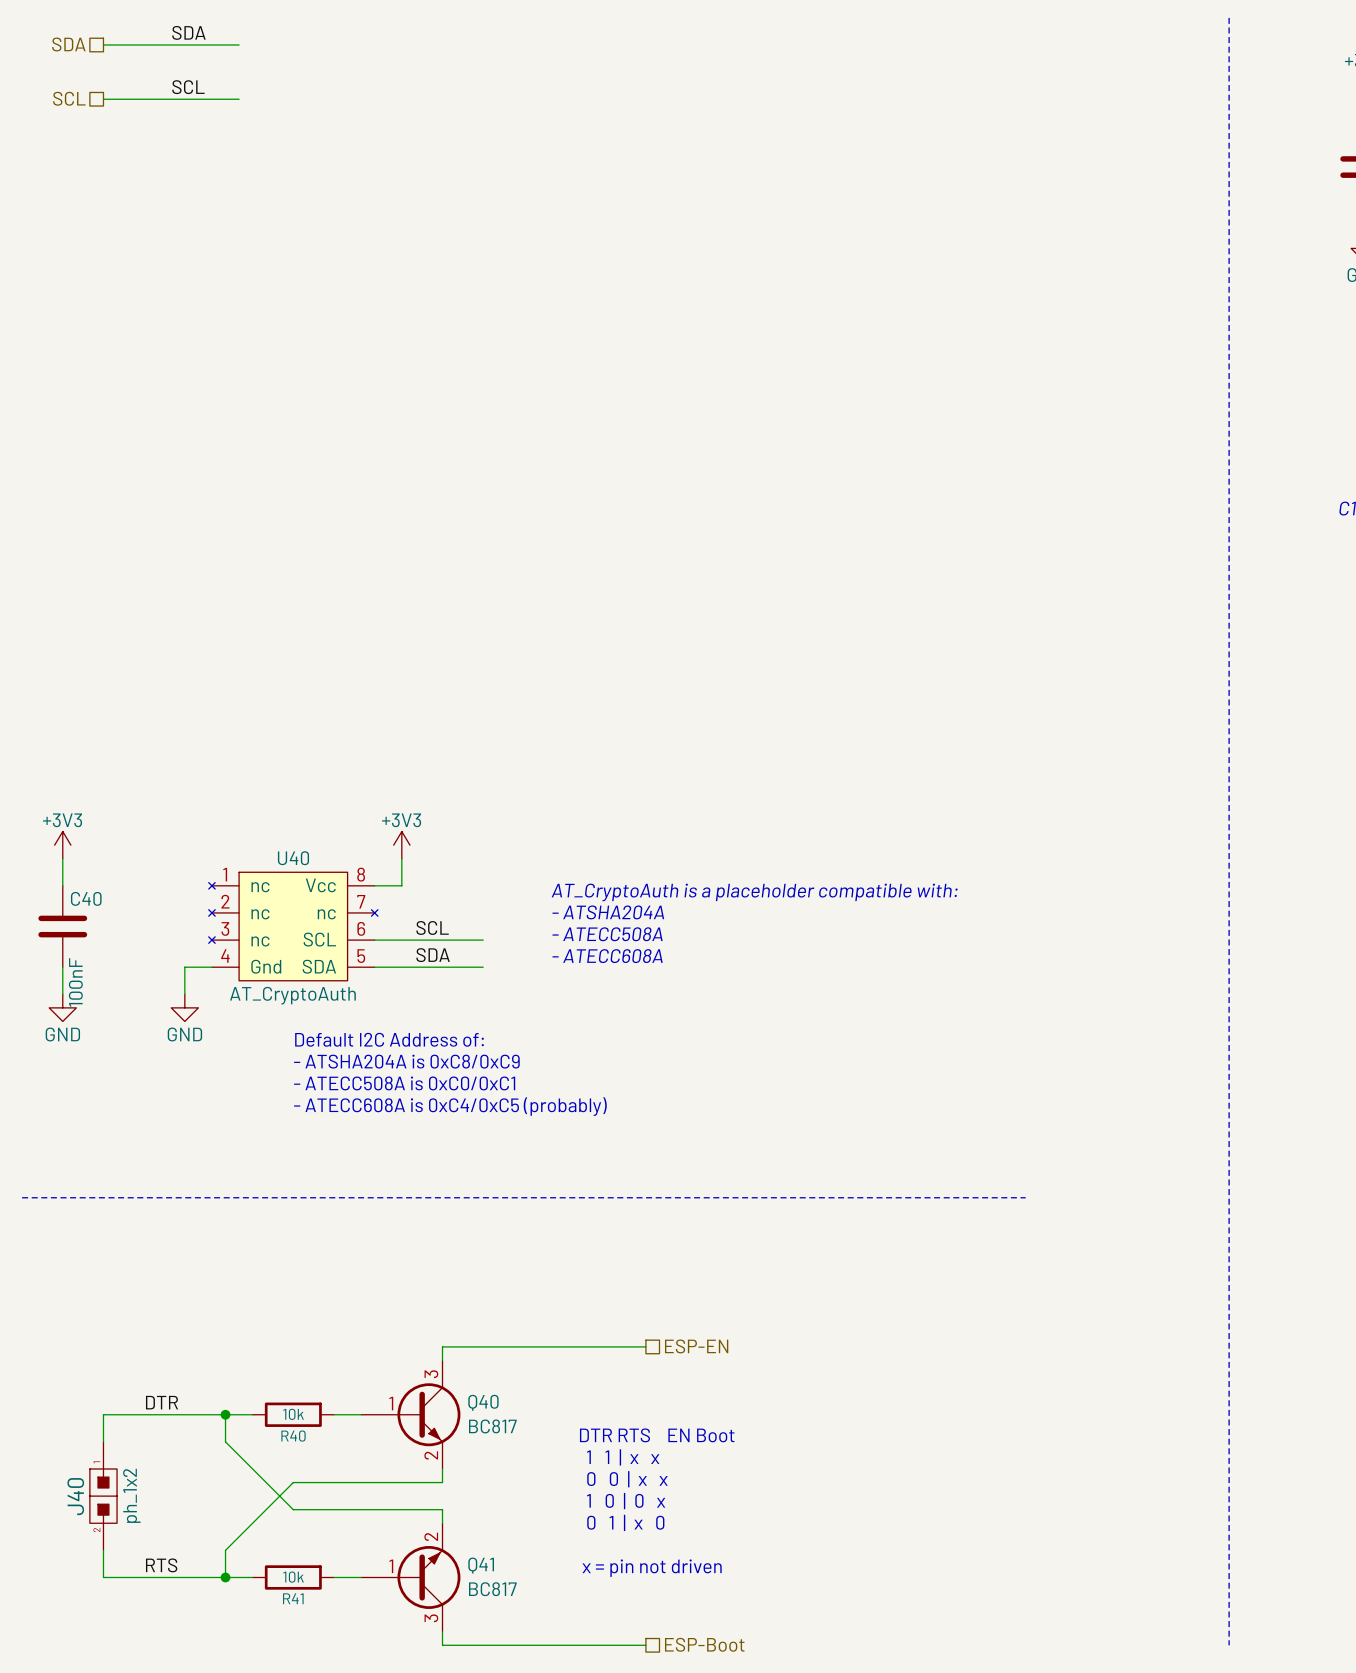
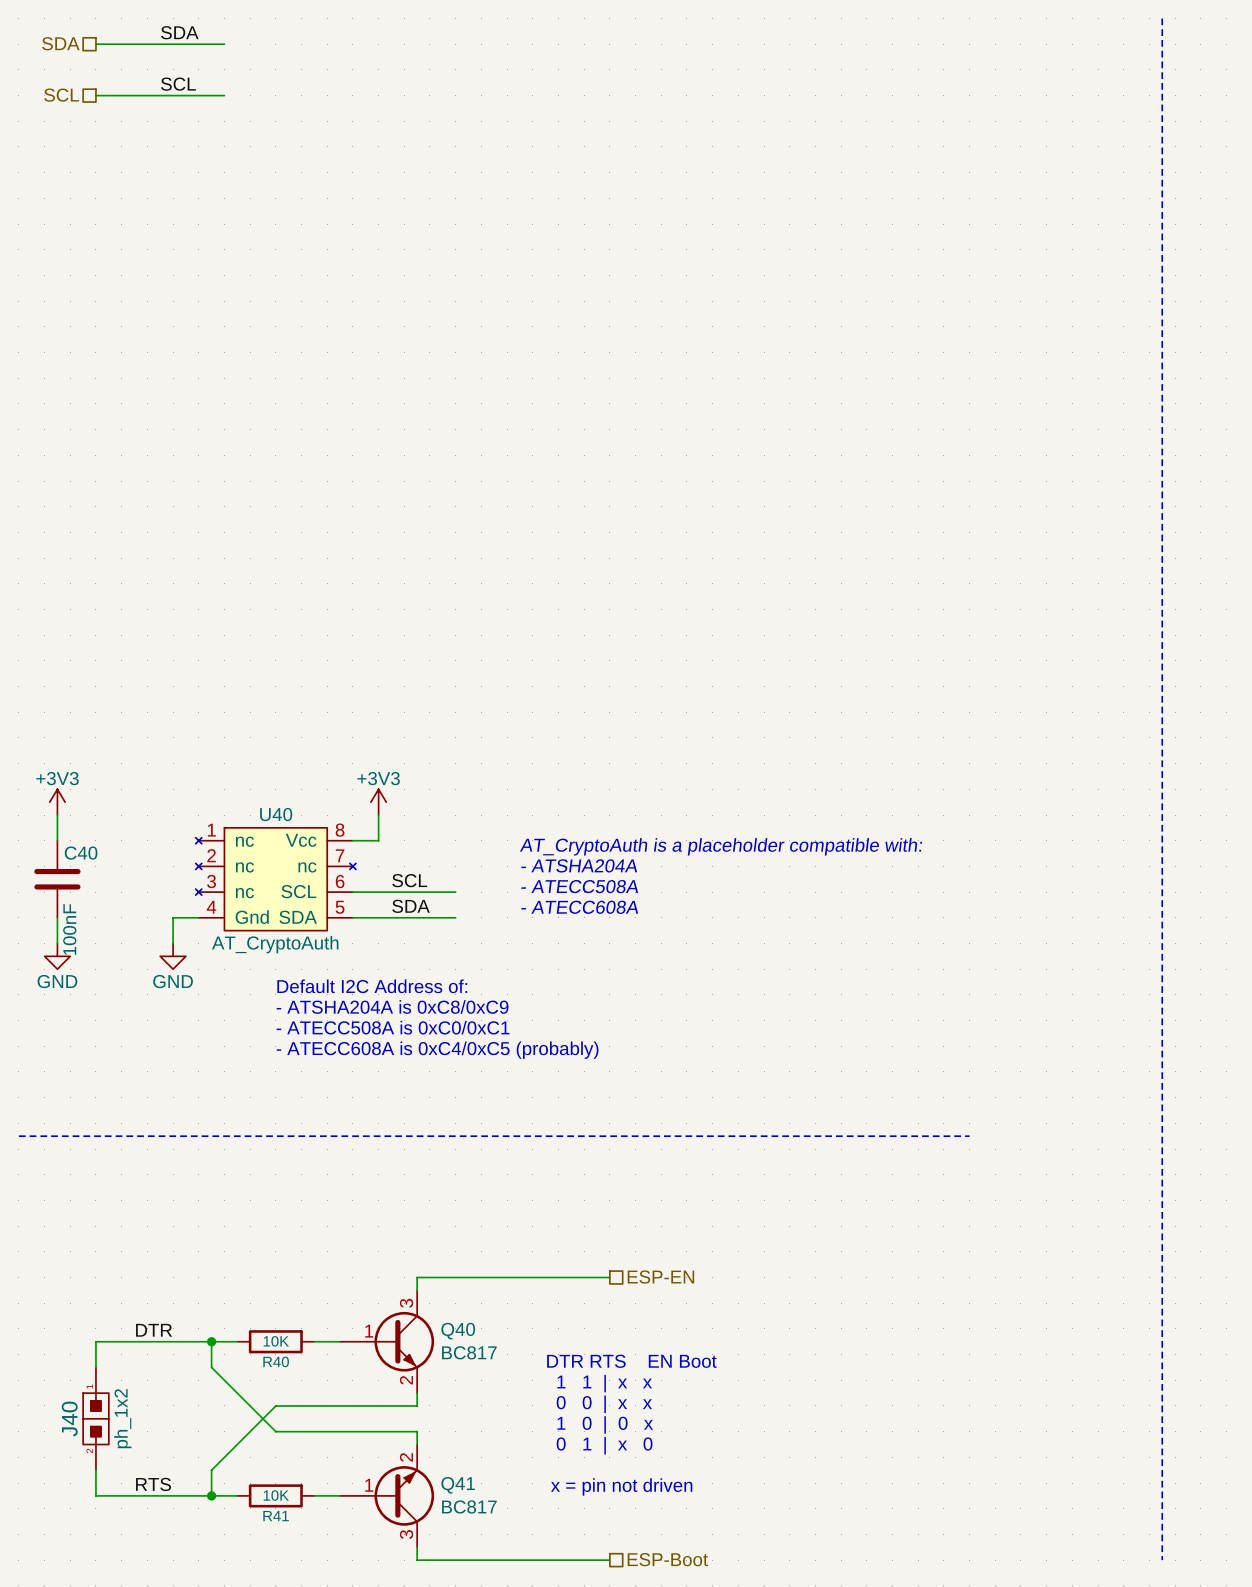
R40 value: 10k (293, 1414) -> 10K (276, 1341)
R41 value: 10k (293, 1577) -> 10K (276, 1495)

